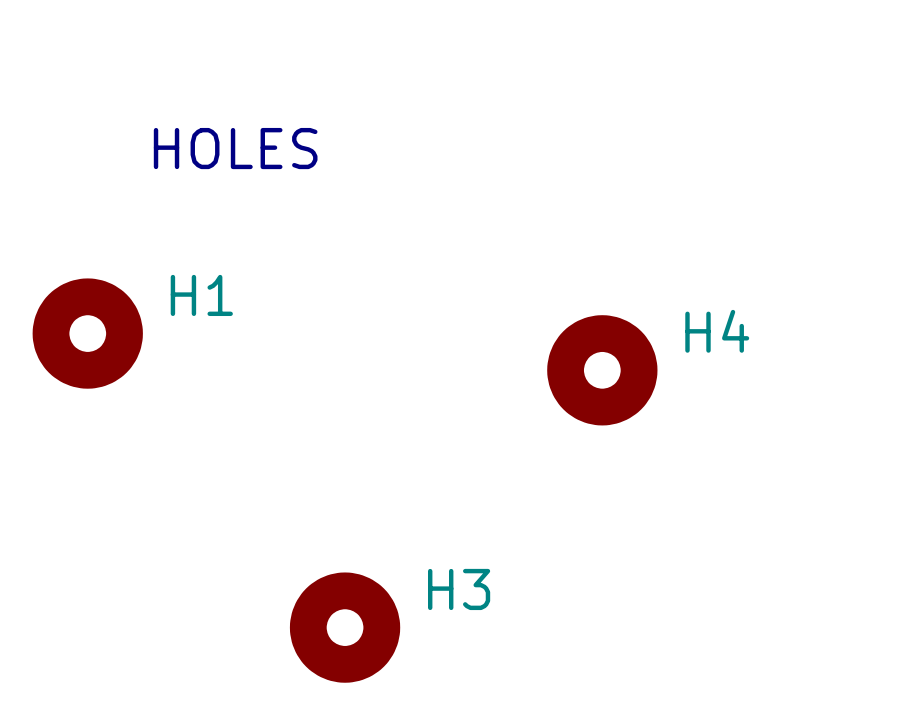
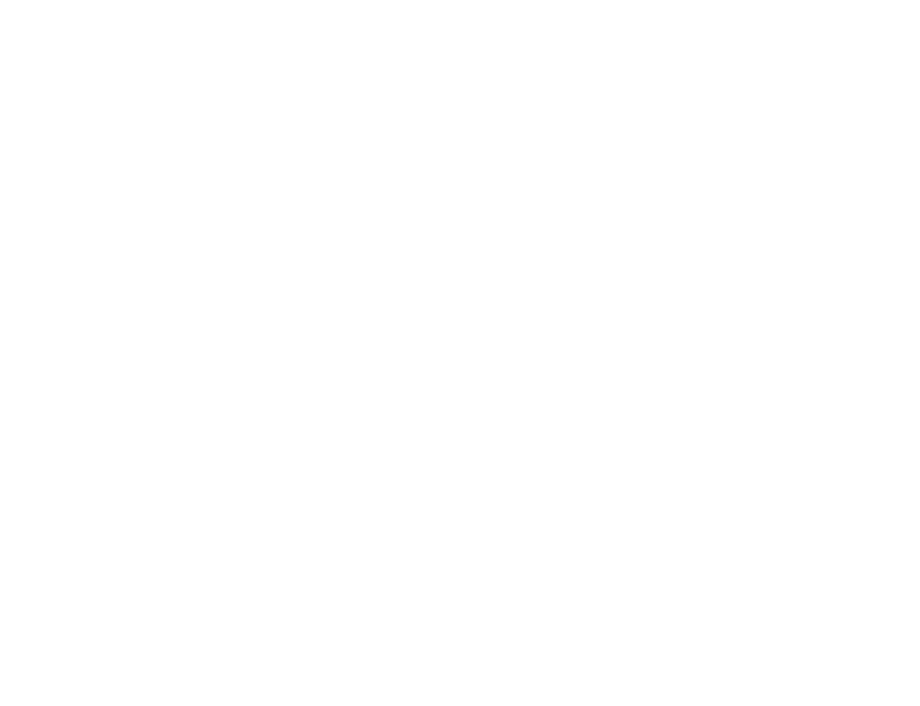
text: HOLES (235, 148) -> none
H1: (87, 333) -> none
H4: (602, 370) -> none
H3: (345, 627) -> none

